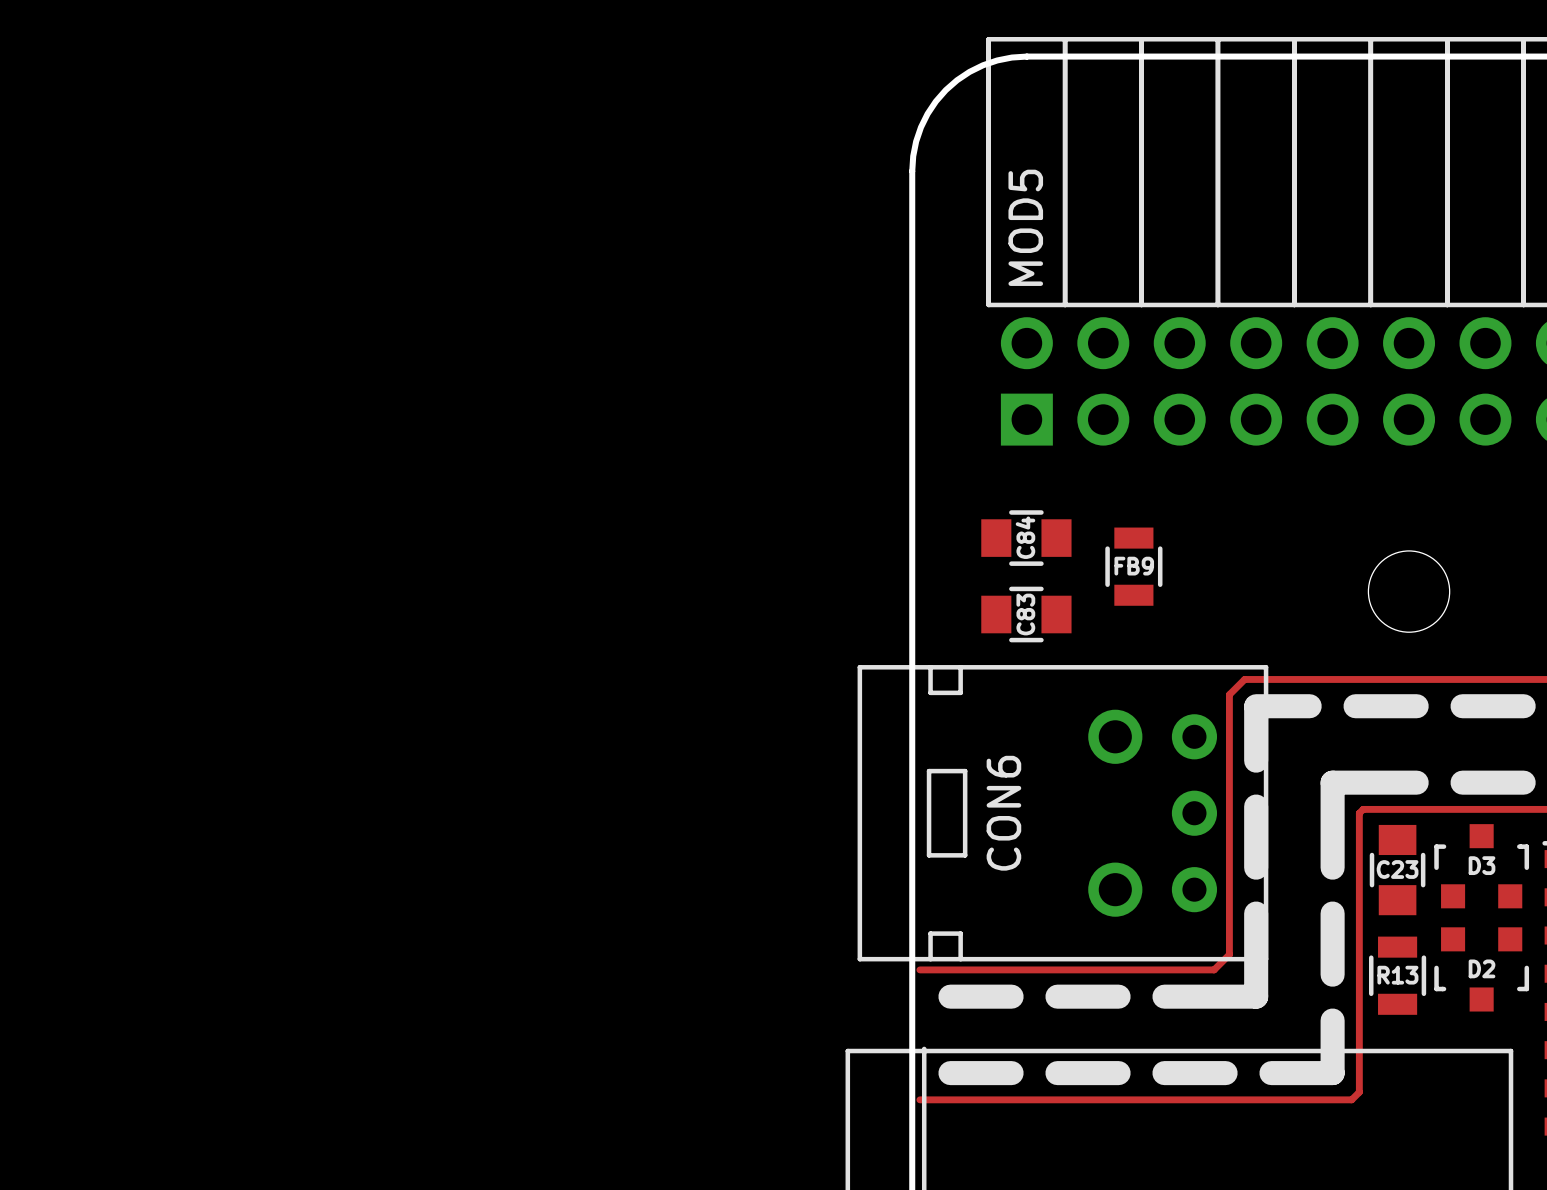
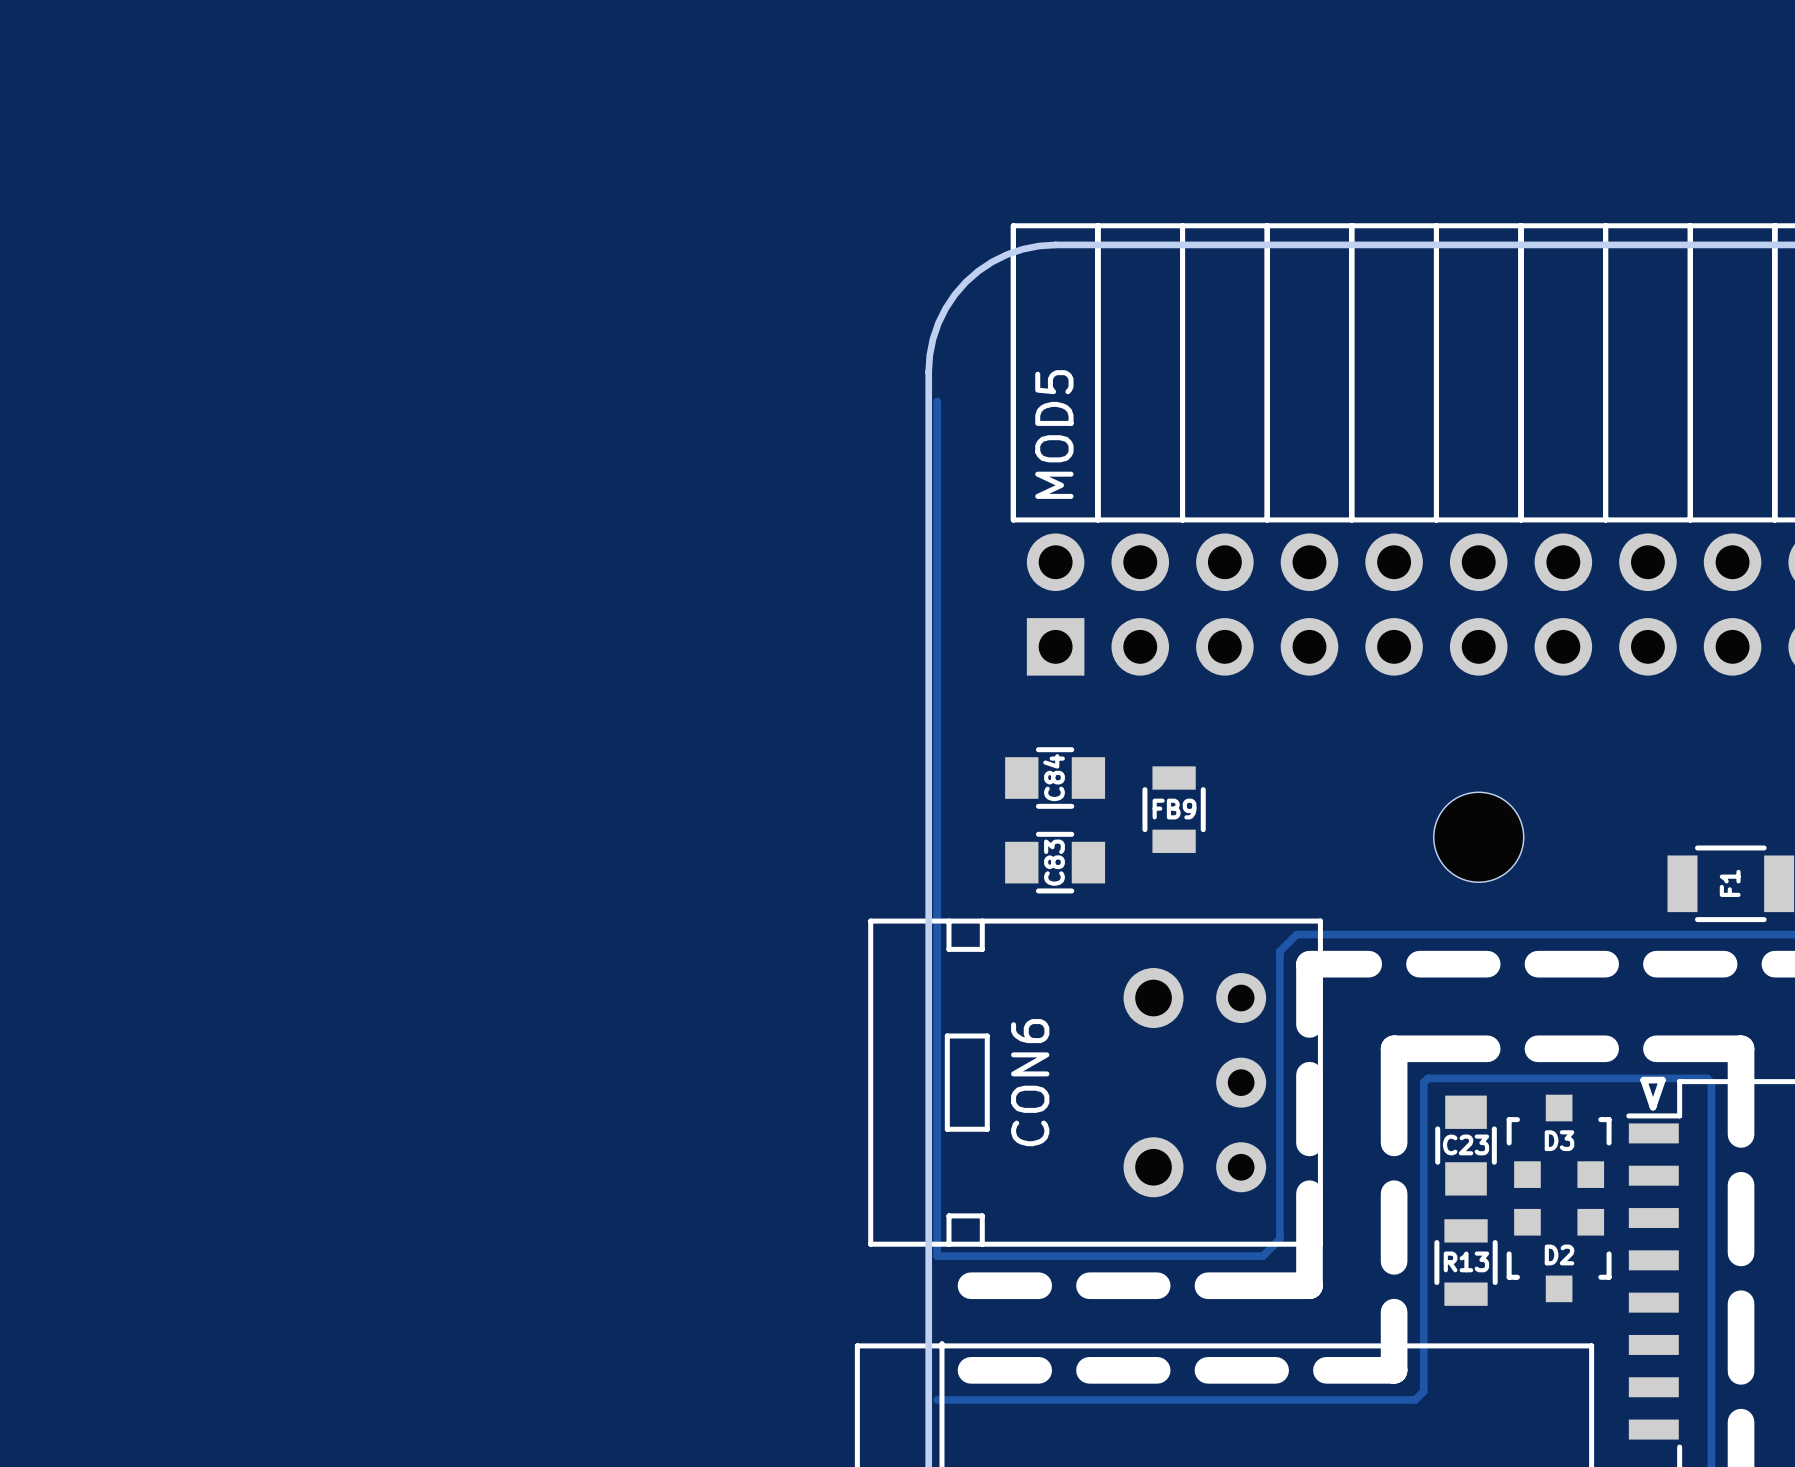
track: none -> (937, 401) (937, 1256)

